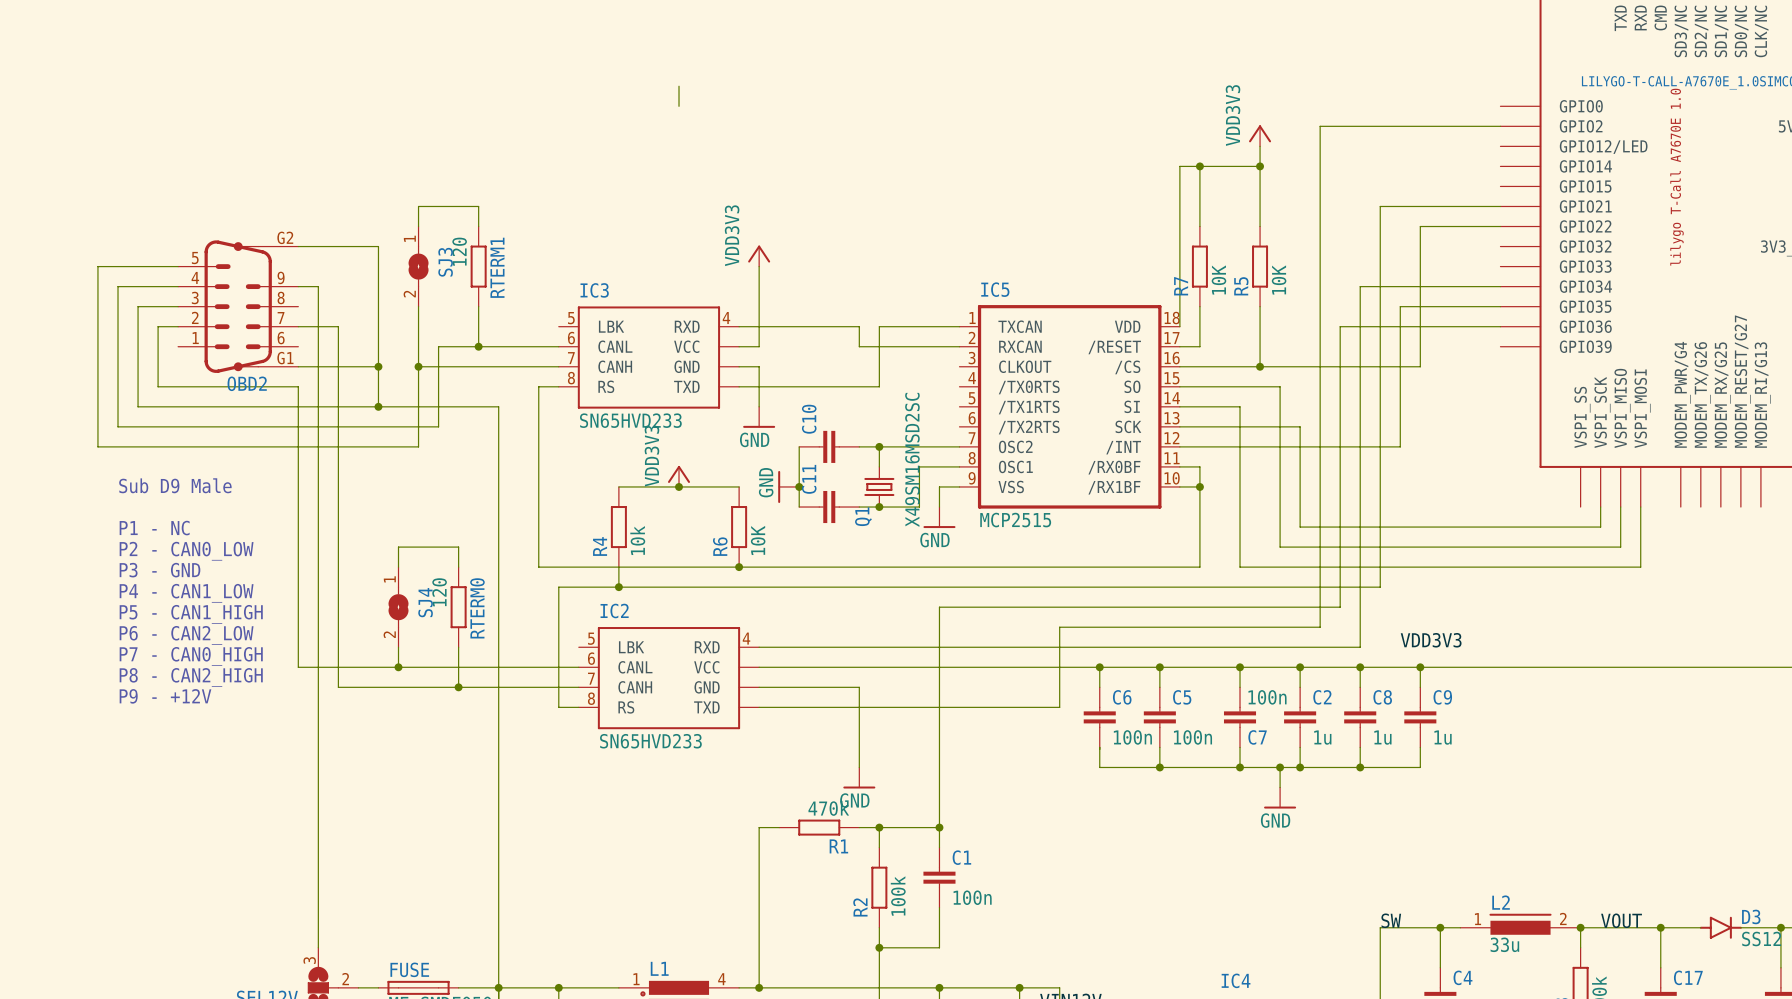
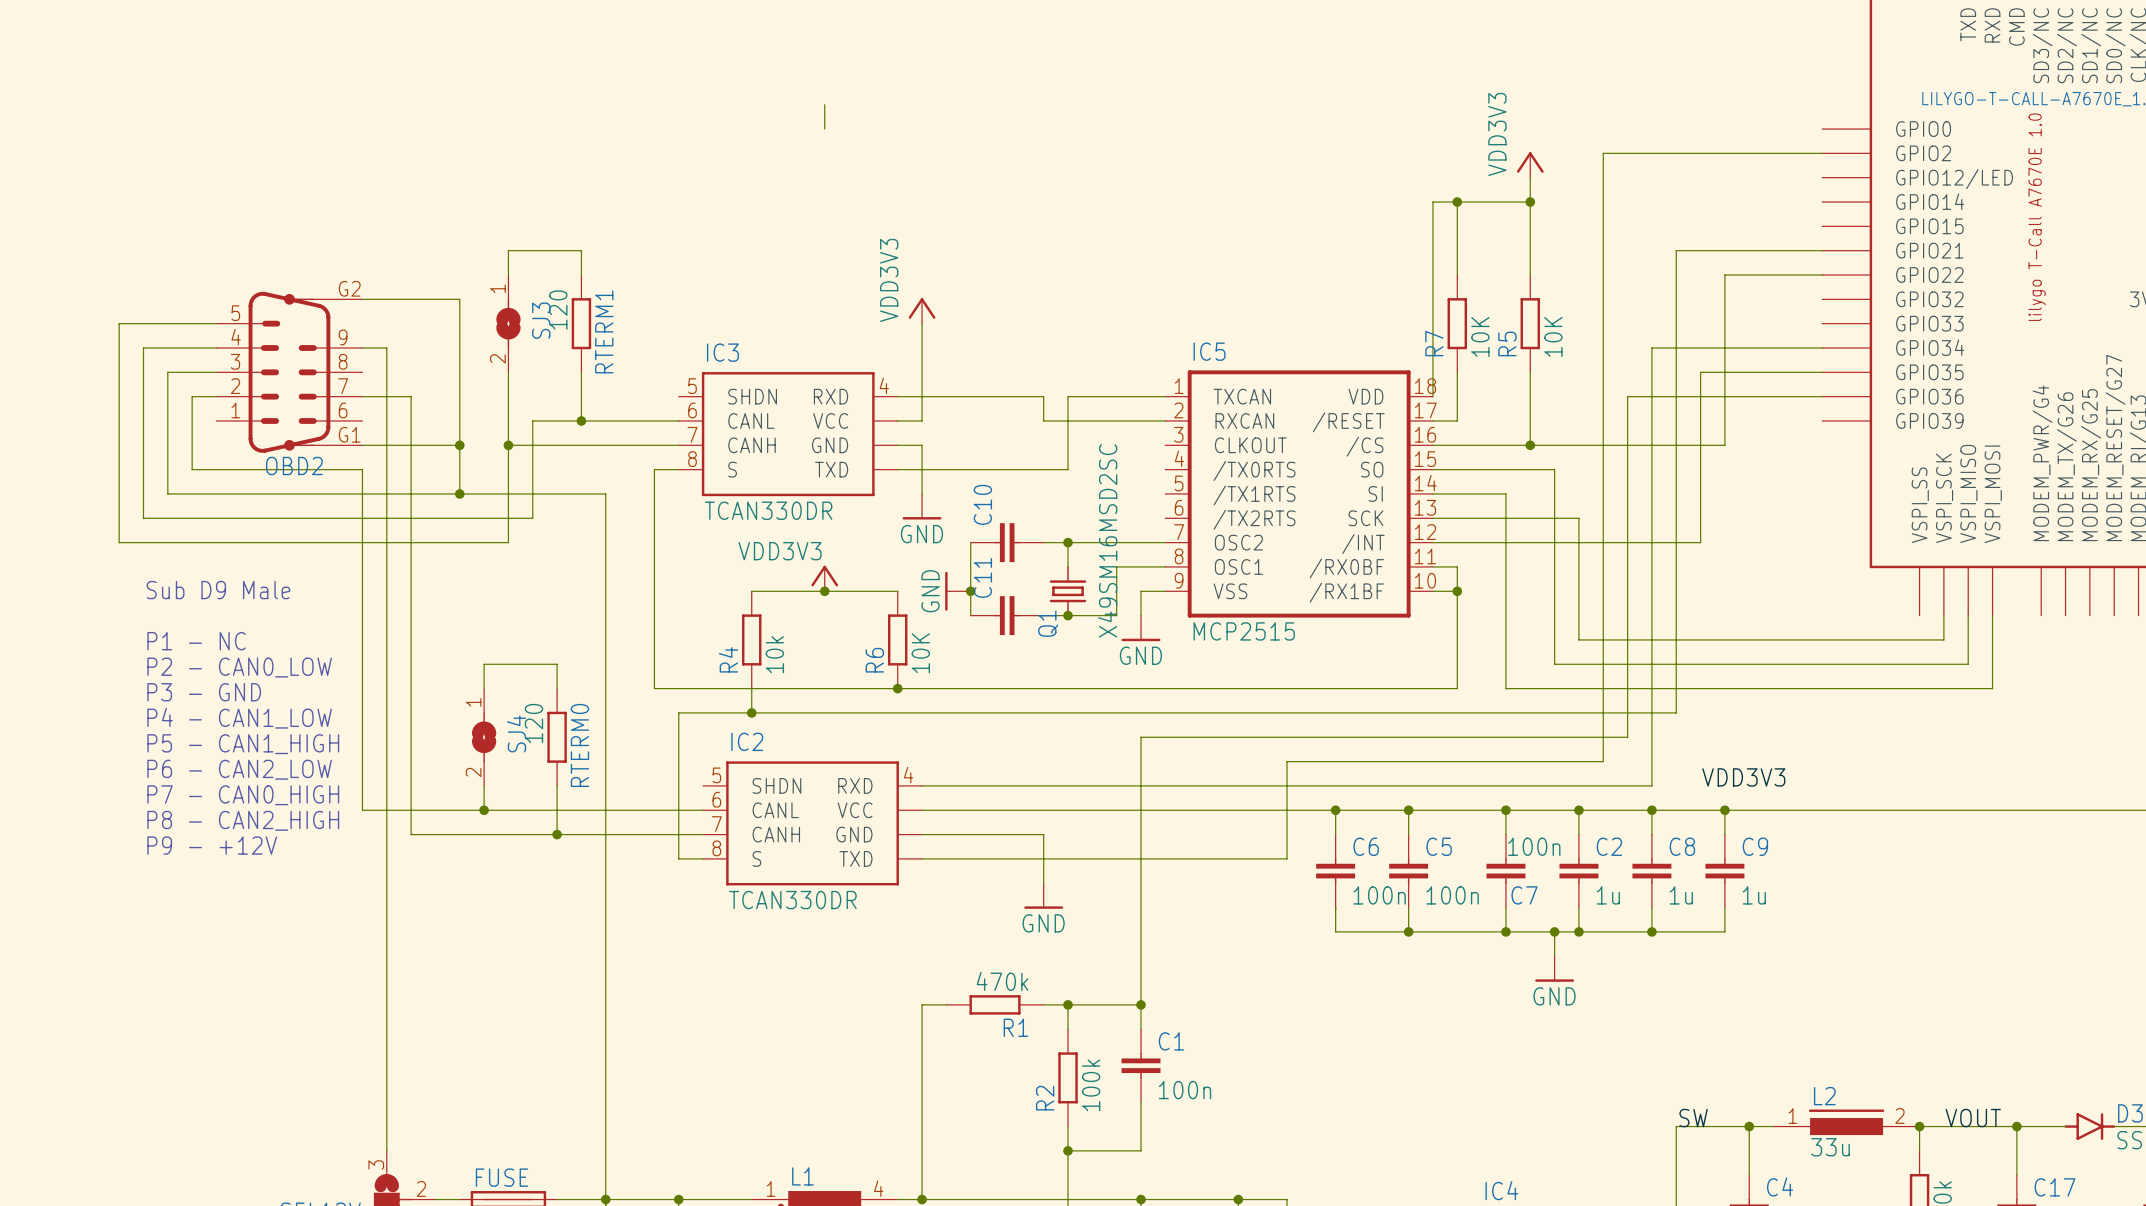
IC3 pin name: LBK (611, 326) -> SHDN (752, 396)
IC3 pin name: RS (606, 386) -> S (732, 469)
IC3 value: SN65HVD233 (630, 420) -> TCAN330DR (768, 510)
power symbol text rotation: 0° (651, 456) -> 90° clockwise (780, 551)
IC2 pin name: LBK (631, 647) -> SHDN (776, 785)
IC2 pin name: RS (626, 707) -> S (756, 858)
IC2 value: SN65HVD233 (650, 741) -> TCAN330DR (792, 900)
power symbol position: GND (859, 778) -> GND (1043, 896)

